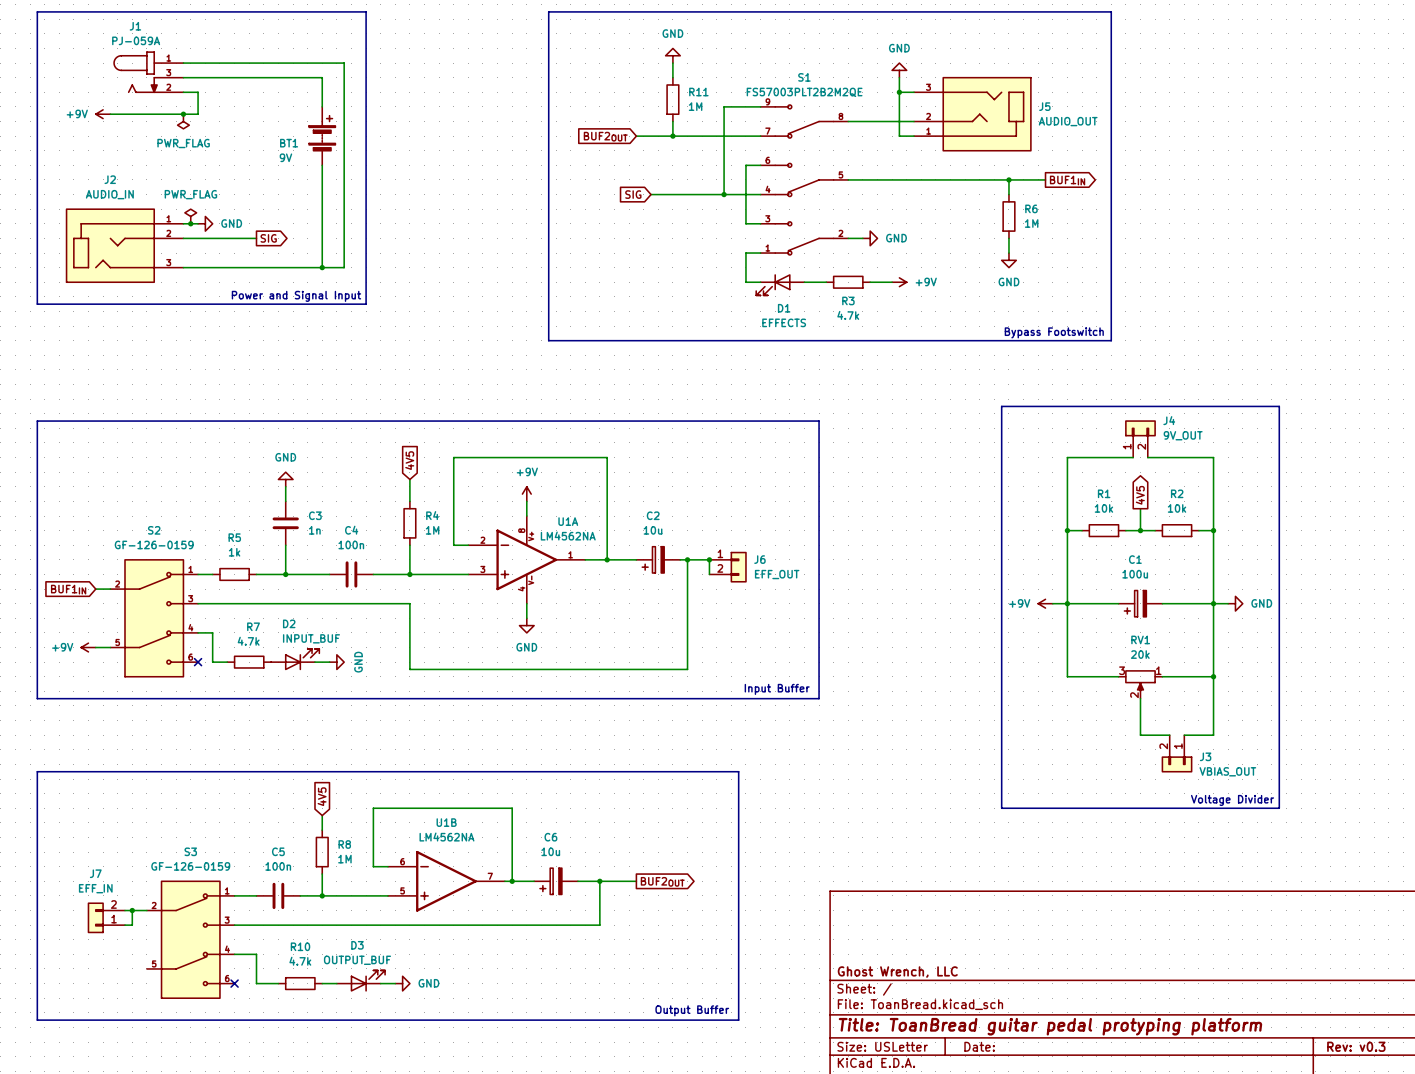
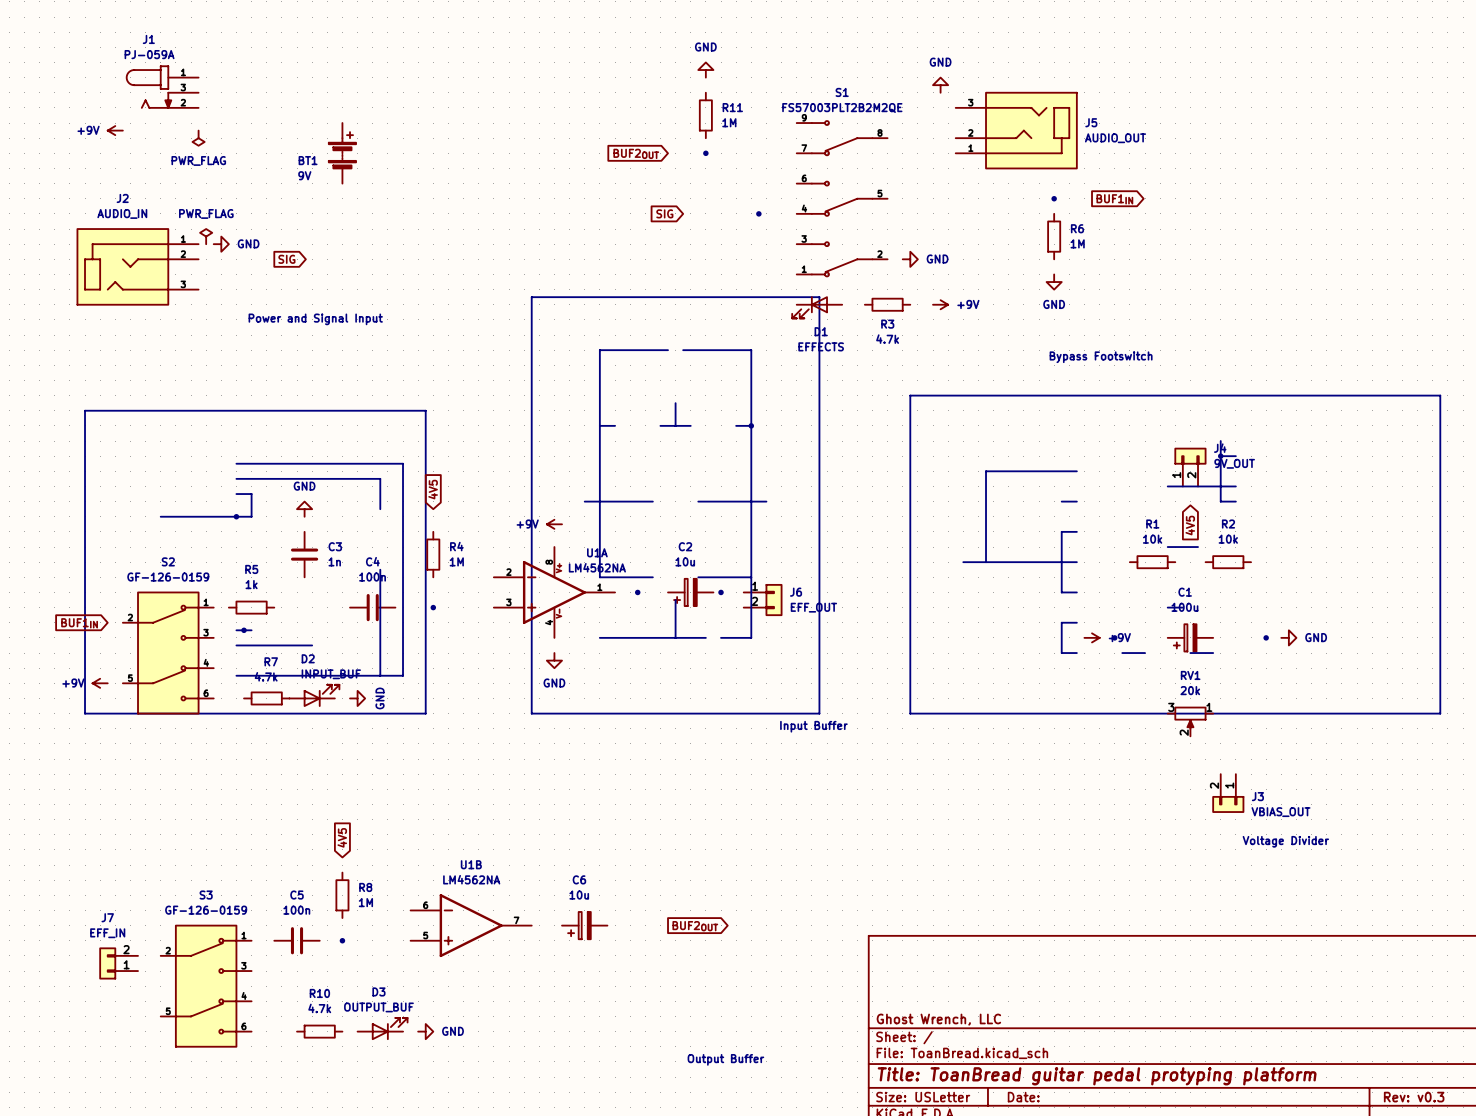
line: (37, 11) (37, 304) (366, 304) (366, 11) (37, 11) -> none
line: (548, 11) (1111, 11) (1111, 340) (548, 340) (548, 11) -> none
wire: (183, 63) (344, 63) (344, 267) (183, 267) -> none
wire: (672, 63) (672, 77) -> none
wire: (183, 77) (322, 77) (322, 106) -> none
wire: (899, 77) (899, 136) (914, 136) -> none
wire: (183, 92) (198, 92) (198, 114) (110, 114) -> none
wire: (899, 92) (914, 92) -> none
junction: (899, 92) -> none
wire: (760, 106) (724, 106) (724, 194) -> none
junction: (183, 114) -> none
wire: (672, 121) (672, 136) -> none
wire: (848, 121) (914, 121) -> none
wire: (636, 136) (760, 136) -> none
wire: (322, 165) (322, 267) -> none
wire: (760, 165) (745, 165) (745, 223) (760, 223) -> none
wire: (848, 179) (1045, 179) -> none
wire: (1008, 179) (1008, 194) -> none
wire: (651, 194) (760, 194) -> none
wire: (183, 223) (198, 223) -> none
junction: (190, 223) -> none
wire: (183, 238) (256, 238) -> none
wire: (848, 238) (862, 238) -> none
wire: (1008, 238) (1008, 253) -> none
wire: (760, 253) (745, 253) (745, 282) (760, 282) -> none
junction: (322, 267) -> none
line: none -> (531, 297) (819, 297) (819, 713) (531, 713) (531, 297)
wire: (804, 282) (826, 282) -> none
wire: (870, 282) (892, 282) -> none
wire: none -> (668, 350) (599, 350) (599, 577) (652, 577)
wire: none -> (683, 350) (751, 350) (751, 637) (721, 637)
line: none -> (910, 395) (1440, 395) (1440, 713) (910, 713) (910, 395)
wire: none -> (675, 403) (675, 425)
line: none -> (85, 410) (425, 410) (425, 713) (85, 713) (85, 410)
wire: none -> (599, 425) (615, 425)
wire: none -> (660, 425) (690, 425)
wire: none -> (736, 425) (751, 425)
junction: none -> (751, 425)
line: (1001, 406) (1279, 406) (1279, 808) (1001, 808) (1001, 406) -> none
wire: none -> (1220, 441) (1220, 501) (1235, 501)
line: (37, 421) (819, 421) (819, 698) (37, 698) (37, 421) -> none
wire: none -> (1220, 456) (1235, 456)
junction: none -> (1220, 456)
wire: none -> (236, 463) (403, 463) (403, 675) (236, 675)
wire: none -> (1076, 471) (986, 471) (986, 562)
wire: none -> (236, 478) (380, 478) (380, 509)
wire: (1118, 457) (1067, 457) (1067, 676) (1118, 676) -> none
wire: (1184, 457) (1213, 457) (1213, 735) (1184, 735) -> none
wire: none -> (236, 494) (251, 494) (251, 516) (160, 516)
wire: none -> (584, 501) (652, 501)
wire: none -> (698, 501) (766, 501)
wire: none -> (1061, 501) (1076, 501)
wire: (409, 479) (409, 501) -> none
junction: none -> (236, 516)
wire: (285, 486) (285, 501) -> none
power symbol rotation: 0° (526, 494) -> 90° counterclockwise (554, 524)
wire: (526, 501) (526, 516) -> none
wire: none -> (1076, 531) (1061, 531) (1061, 592) (1076, 592)
wire: (1140, 508) (1140, 530) -> none
wire: none -> (963, 562) (1076, 562)
wire: (1067, 530) (1082, 530) -> (1167, 607) (1182, 607)
junction: (1067, 530) -> none
wire: (1125, 530) (1155, 530) -> (1167, 547) (1198, 547)
junction: (1140, 530) -> none
wire: (1198, 530) (1213, 530) -> (1182, 486) (1198, 486)
junction: (1213, 530) -> none
wire: none -> (380, 569) (380, 675)
wire: (285, 545) (285, 574) -> none
wire: (409, 545) (409, 574) -> none
wire: (468, 545) (453, 545) (453, 457) (607, 457) (607, 559) -> none
wire: (585, 559) (636, 559) -> (698, 577) (751, 577)
wire: (680, 559) (709, 559) (709, 574) -> none
wire: (687, 559) (687, 669) (409, 669) (409, 603) (198, 603) -> none
junction: (709, 559) -> none
wire: none -> (675, 600) (675, 637)
wire: (198, 574) (212, 574) -> (236, 630) (251, 630)
wire: (256, 574) (329, 574) -> (236, 645) (312, 645)
junction: (285, 574) -> none
wire: (373, 574) (468, 574) -> none
wire: (95, 589) (110, 589) -> none
wire: none -> (1076, 622) (1061, 622) (1061, 653) (1076, 653)
junction: none -> (244, 630)
wire: (526, 603) (526, 618) -> none
wire: none -> (599, 637) (705, 637)
power symbol rotation: 0° (1045, 603) -> 180° (1092, 637)
wire: (1052, 603) (1118, 603) -> none
wire: (1162, 603) (1228, 603) -> none
wire: none -> (1122, 653) (1145, 653)
wire: none -> (1190, 653) (1213, 653)
wire: (198, 632) (212, 632) (212, 662) (227, 662) -> none
wire: (95, 647) (110, 647) -> none
no-connect mark: (198, 662) -> none
wire: (314, 662) (329, 662) -> none
junction: (1213, 676) -> none
wire: (1140, 698) (1140, 735) (1169, 735) -> none
line: (37, 771) (37, 1020) (738, 1020) (738, 771) (37, 771) -> none
wire: (322, 815) (322, 830) -> none
wire: (388, 866) (373, 866) (373, 808) (512, 808) (512, 881) -> none
wire: (322, 874) (322, 895) -> none
wire: (504, 881) (534, 881) -> none
junction: (512, 881) -> none
wire: (577, 881) (636, 881) -> none
wire: (599, 881) (599, 925) (234, 925) -> none
junction: (599, 881) -> none
wire: (234, 895) (256, 895) -> none
wire: (300, 895) (388, 895) -> none
wire: (124, 910) (146, 910) -> none
wire: (132, 910) (132, 925) (124, 925) -> none
junction: (132, 910) -> none
wire: (234, 954) (256, 954) (256, 983) (278, 983) -> none
no-connect mark: (234, 983) -> none
wire: (322, 983) (336, 983) -> none
wire: (380, 983) (395, 983) -> none

